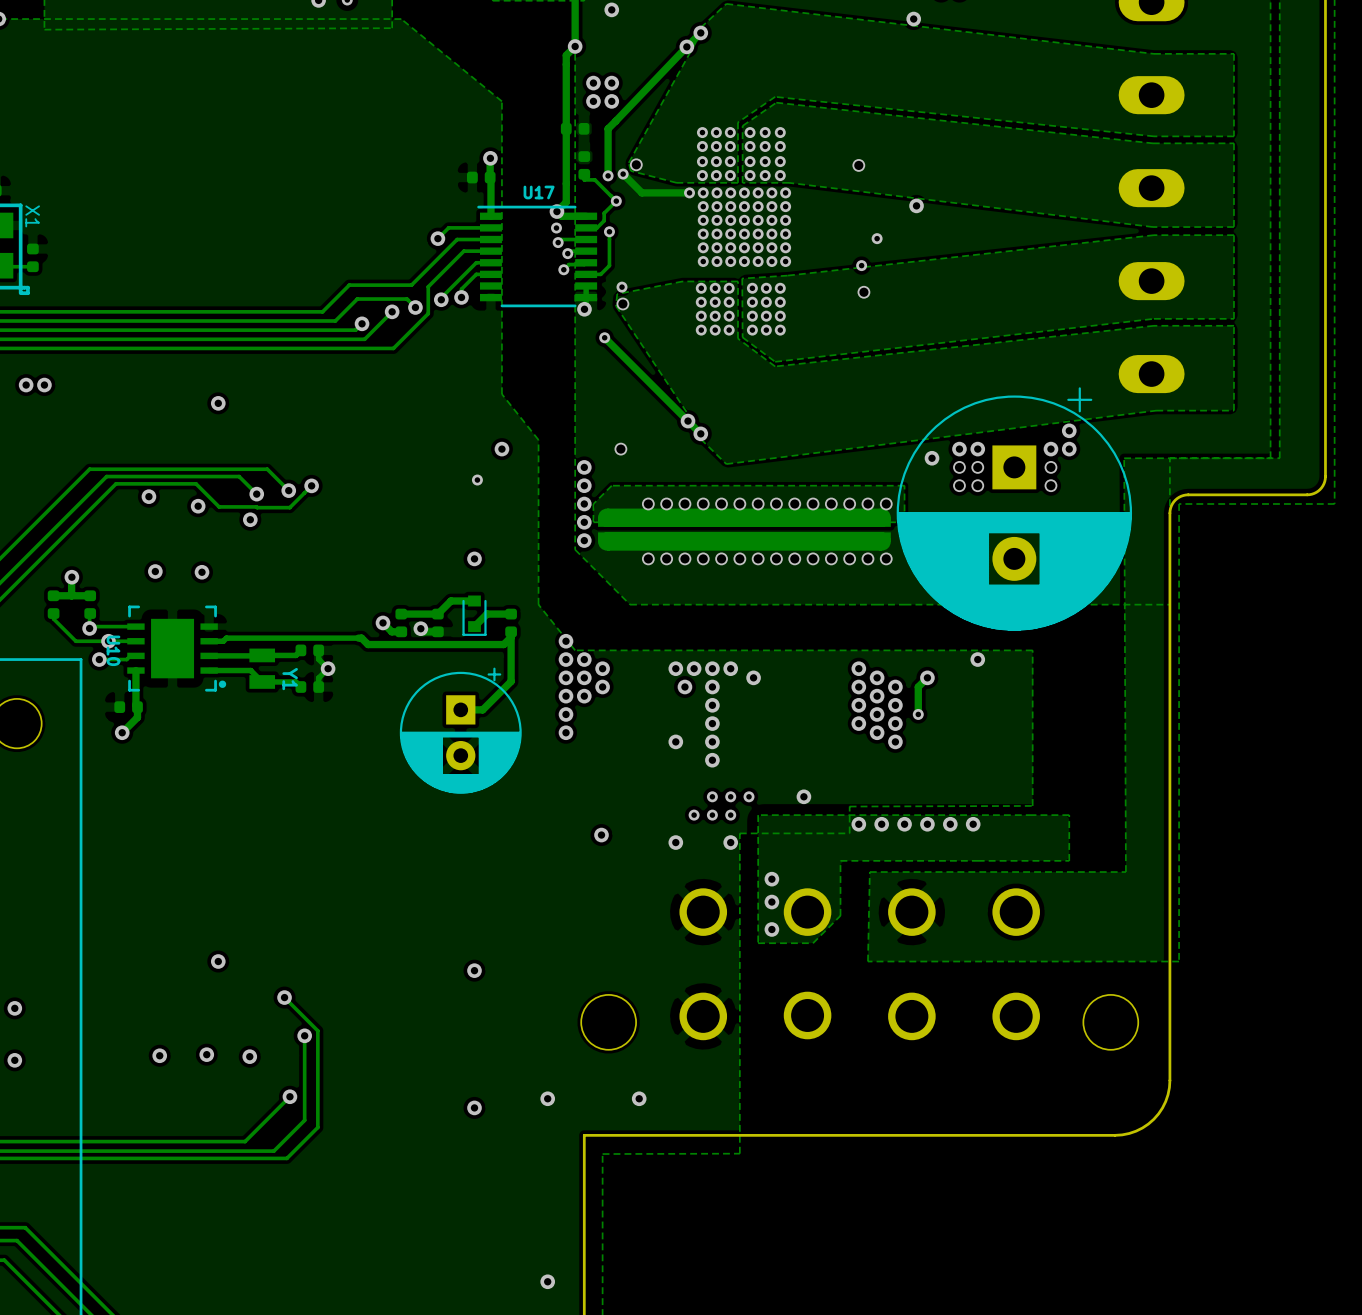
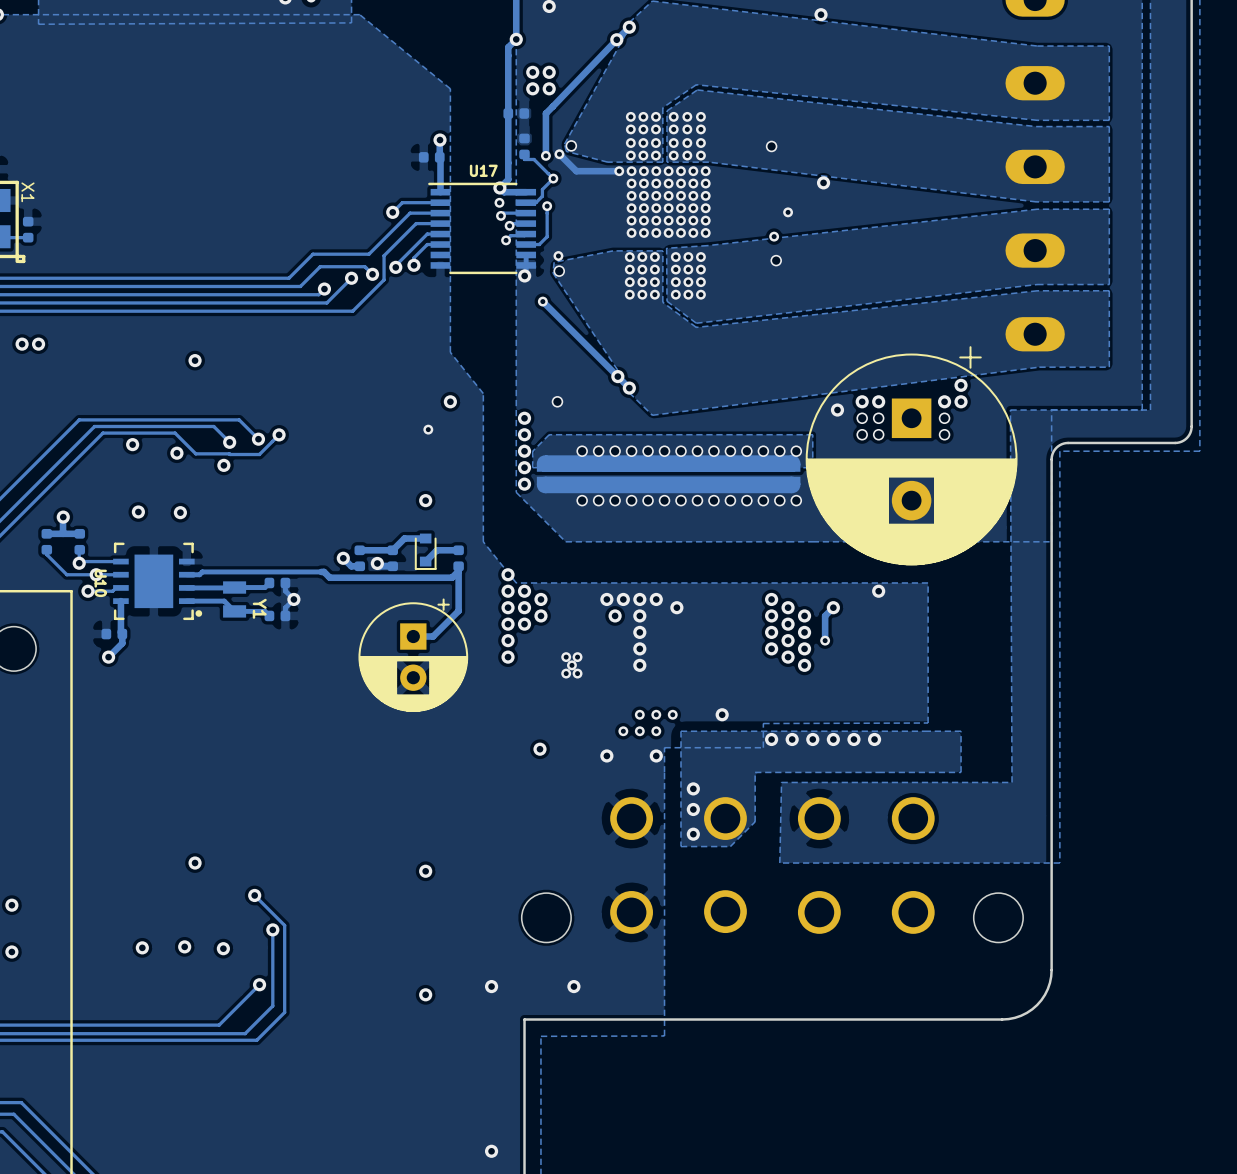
via: none -> (566, 657)
via: none -> (577, 657)
via: none -> (571, 665)
via: (675, 741) -> none
via: none -> (566, 673)
via: none -> (577, 673)
via: (712, 760) -> none

